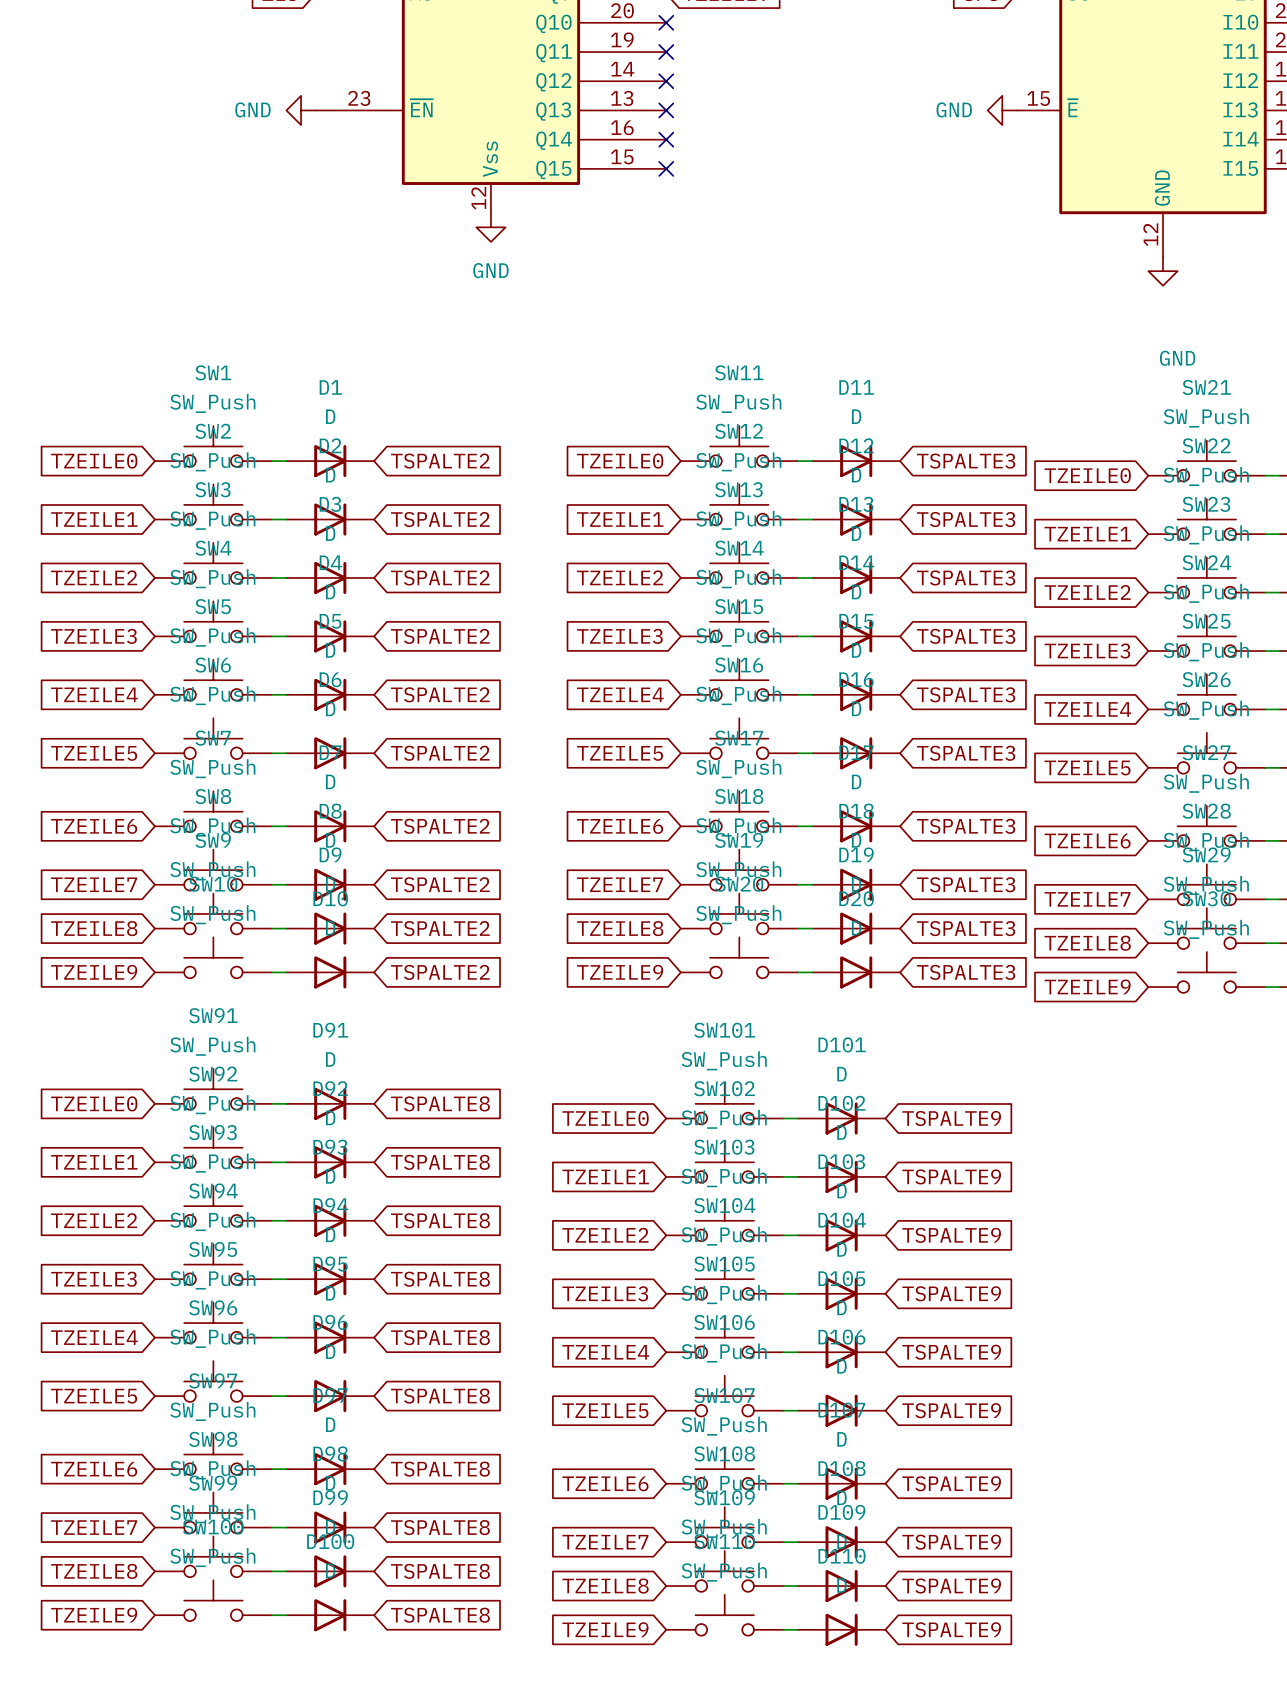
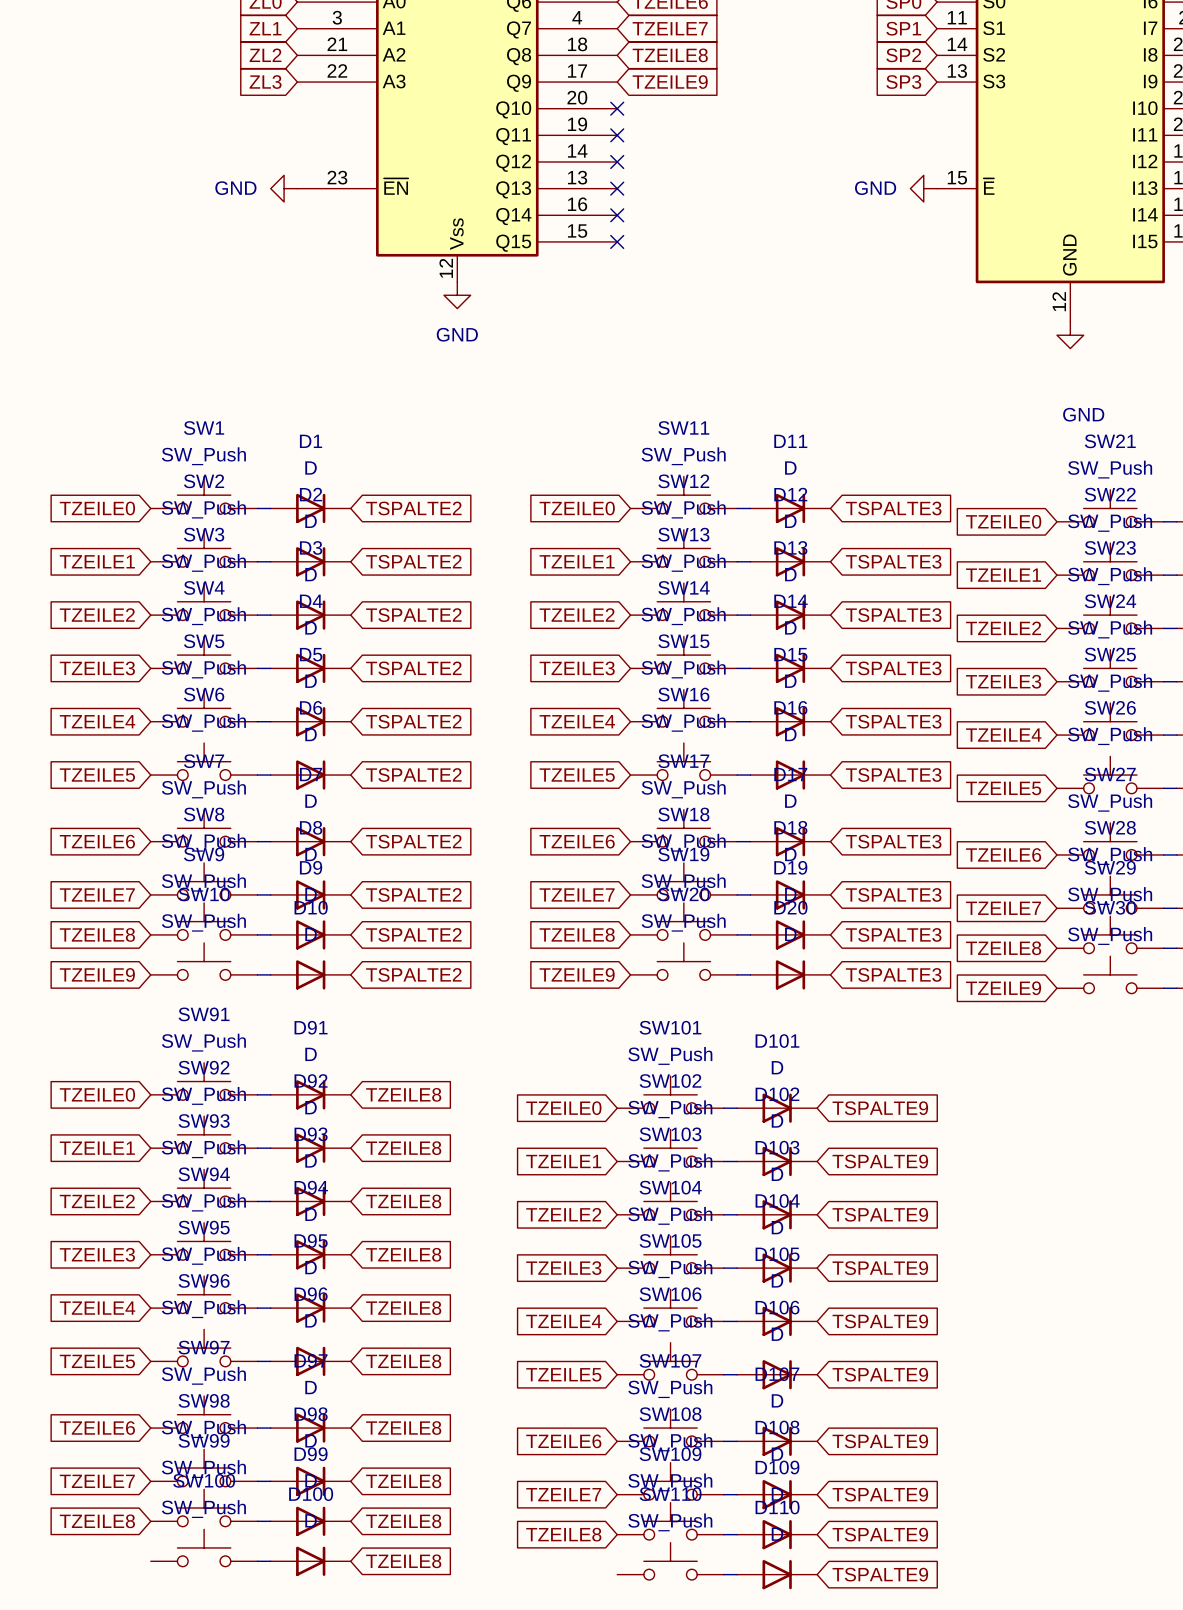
global label: TSPALTE8 (440, 1103) -> TZEILE8 (403, 1094)
global label: TSPALTE8 (440, 1162) -> TZEILE8 (403, 1148)
global label: TSPALTE8 (440, 1220) -> TZEILE8 (403, 1201)
global label: TSPALTE8 (440, 1279) -> TZEILE8 (403, 1254)
global label: TSPALTE8 (440, 1337) -> TZEILE8 (403, 1308)
global label: TSPALTE8 (440, 1396) -> TZEILE8 (403, 1361)
global label: TSPALTE8 (440, 1469) -> TZEILE8 (403, 1428)
global label: TSPALTE8 (440, 1527) -> TZEILE8 (403, 1481)
global label: TSPALTE8 (440, 1571) -> TZEILE8 (403, 1521)
global label: TZEILE9 (94, 1615) -> none
global label: TSPALTE8 (440, 1615) -> TZEILE8 (403, 1561)
global label: TZEILE9 (605, 1629) -> none

